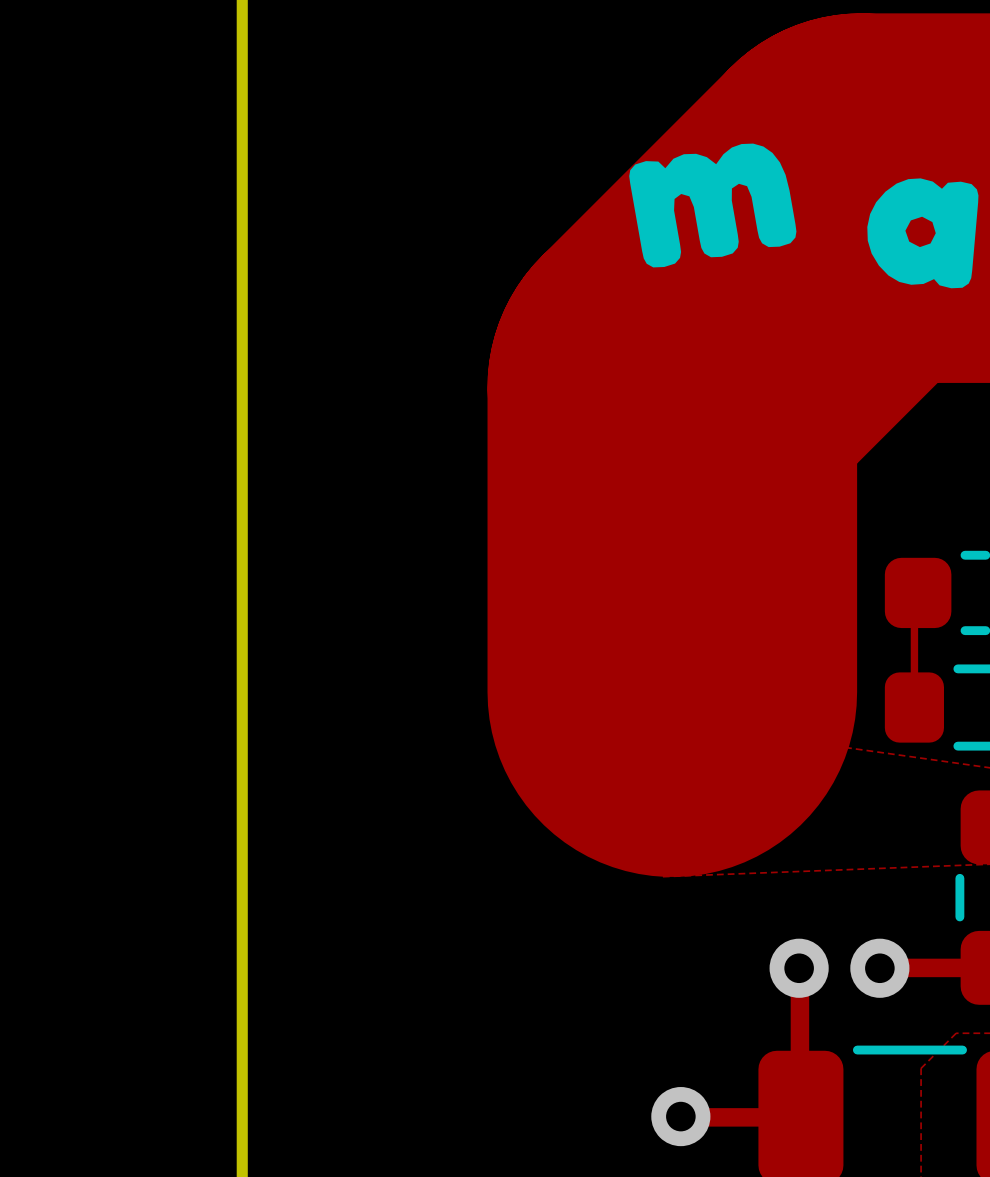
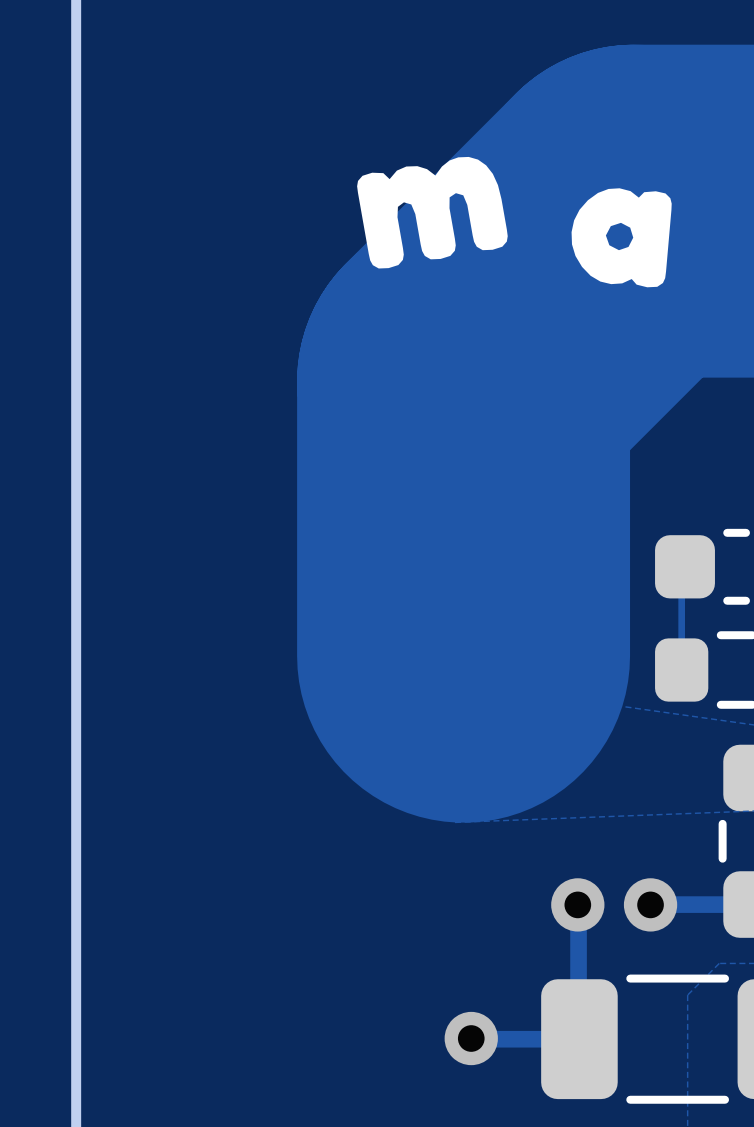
drawing position: (712, 205) -> (432, 212)
drawing position: (922, 233) -> (621, 237)

